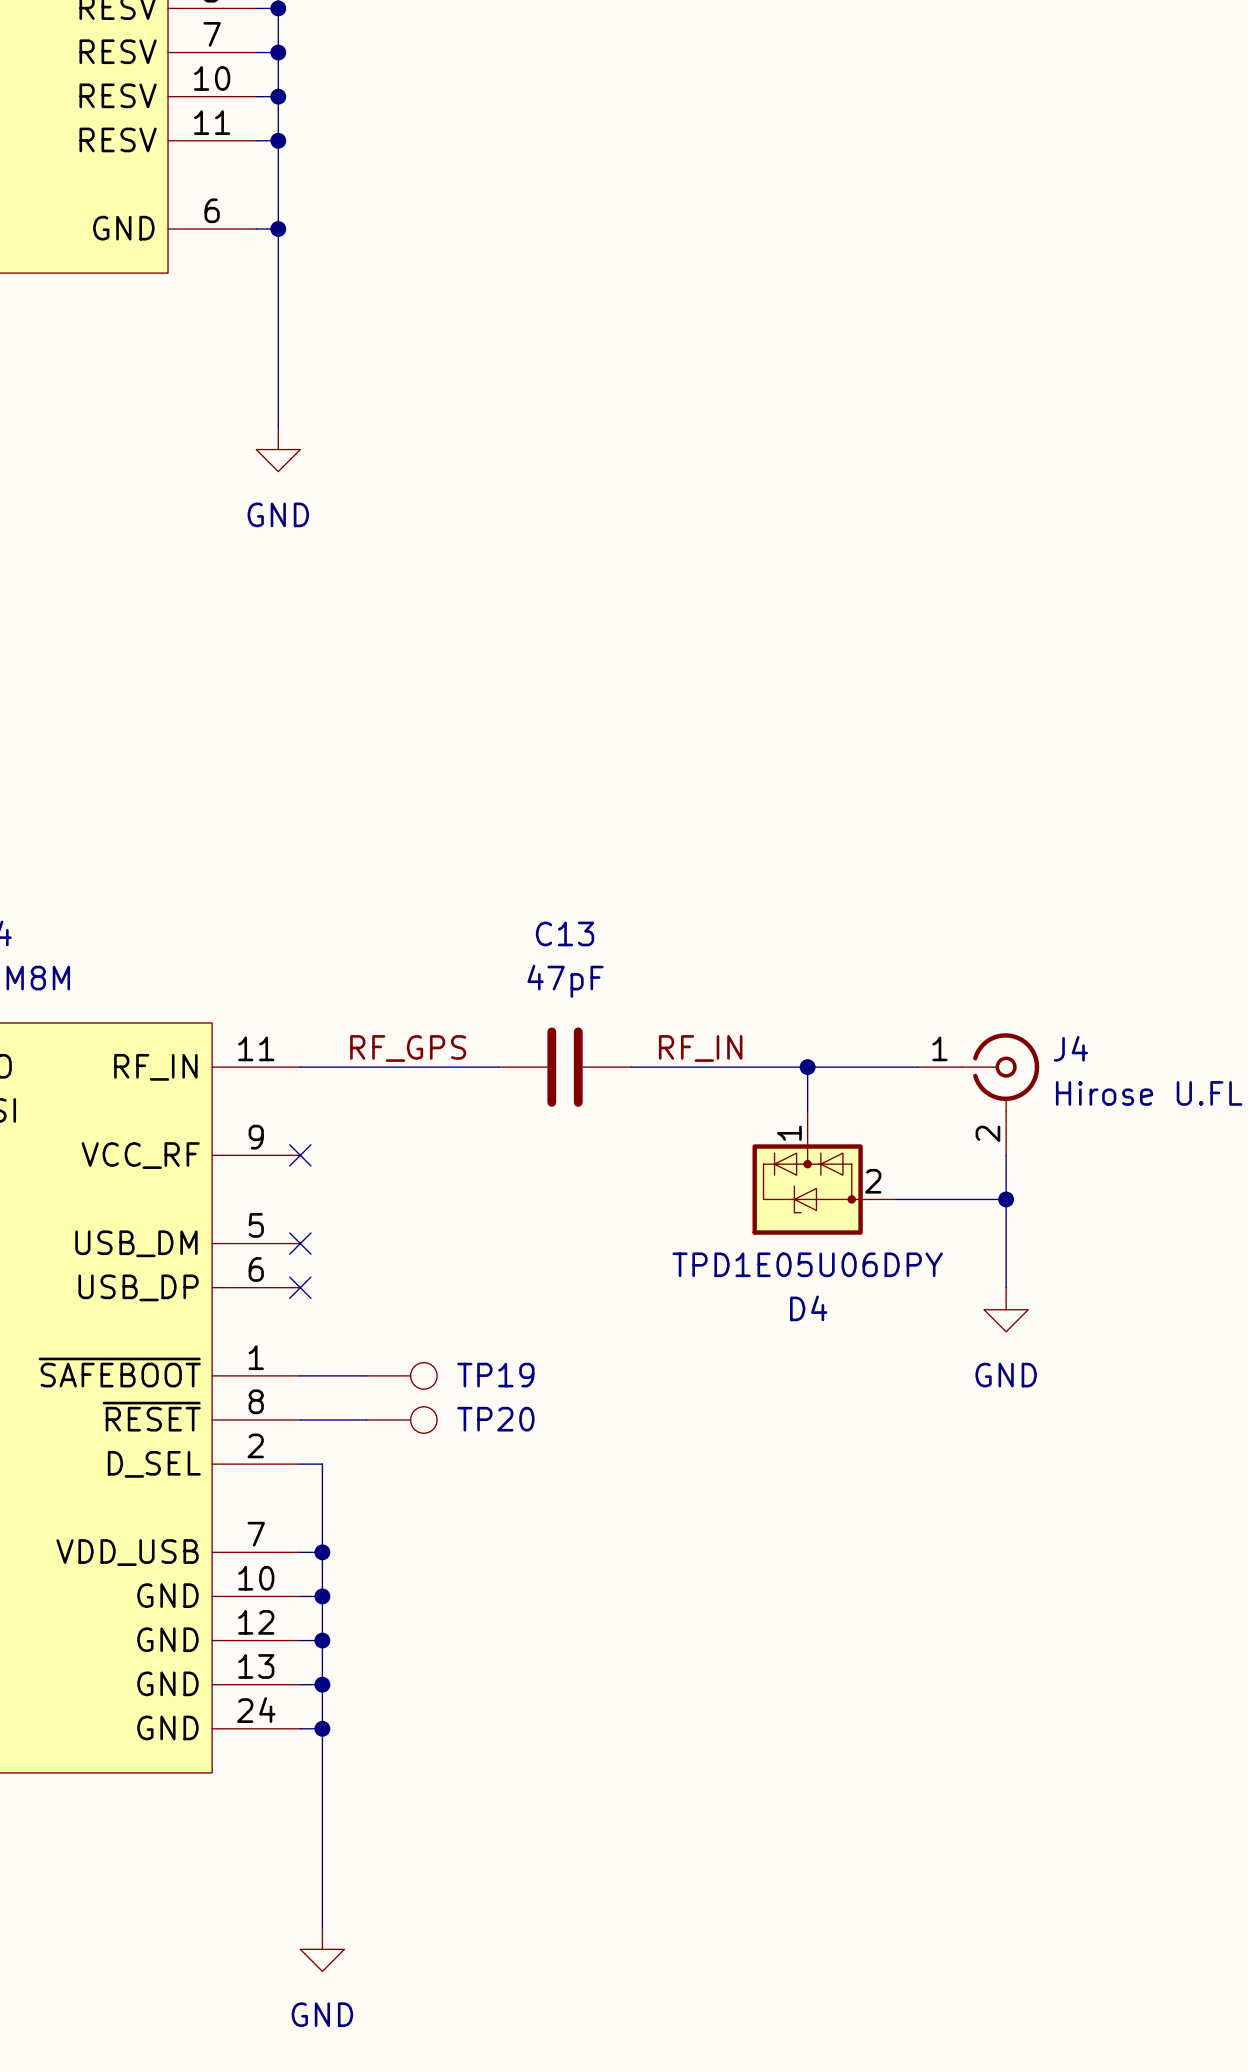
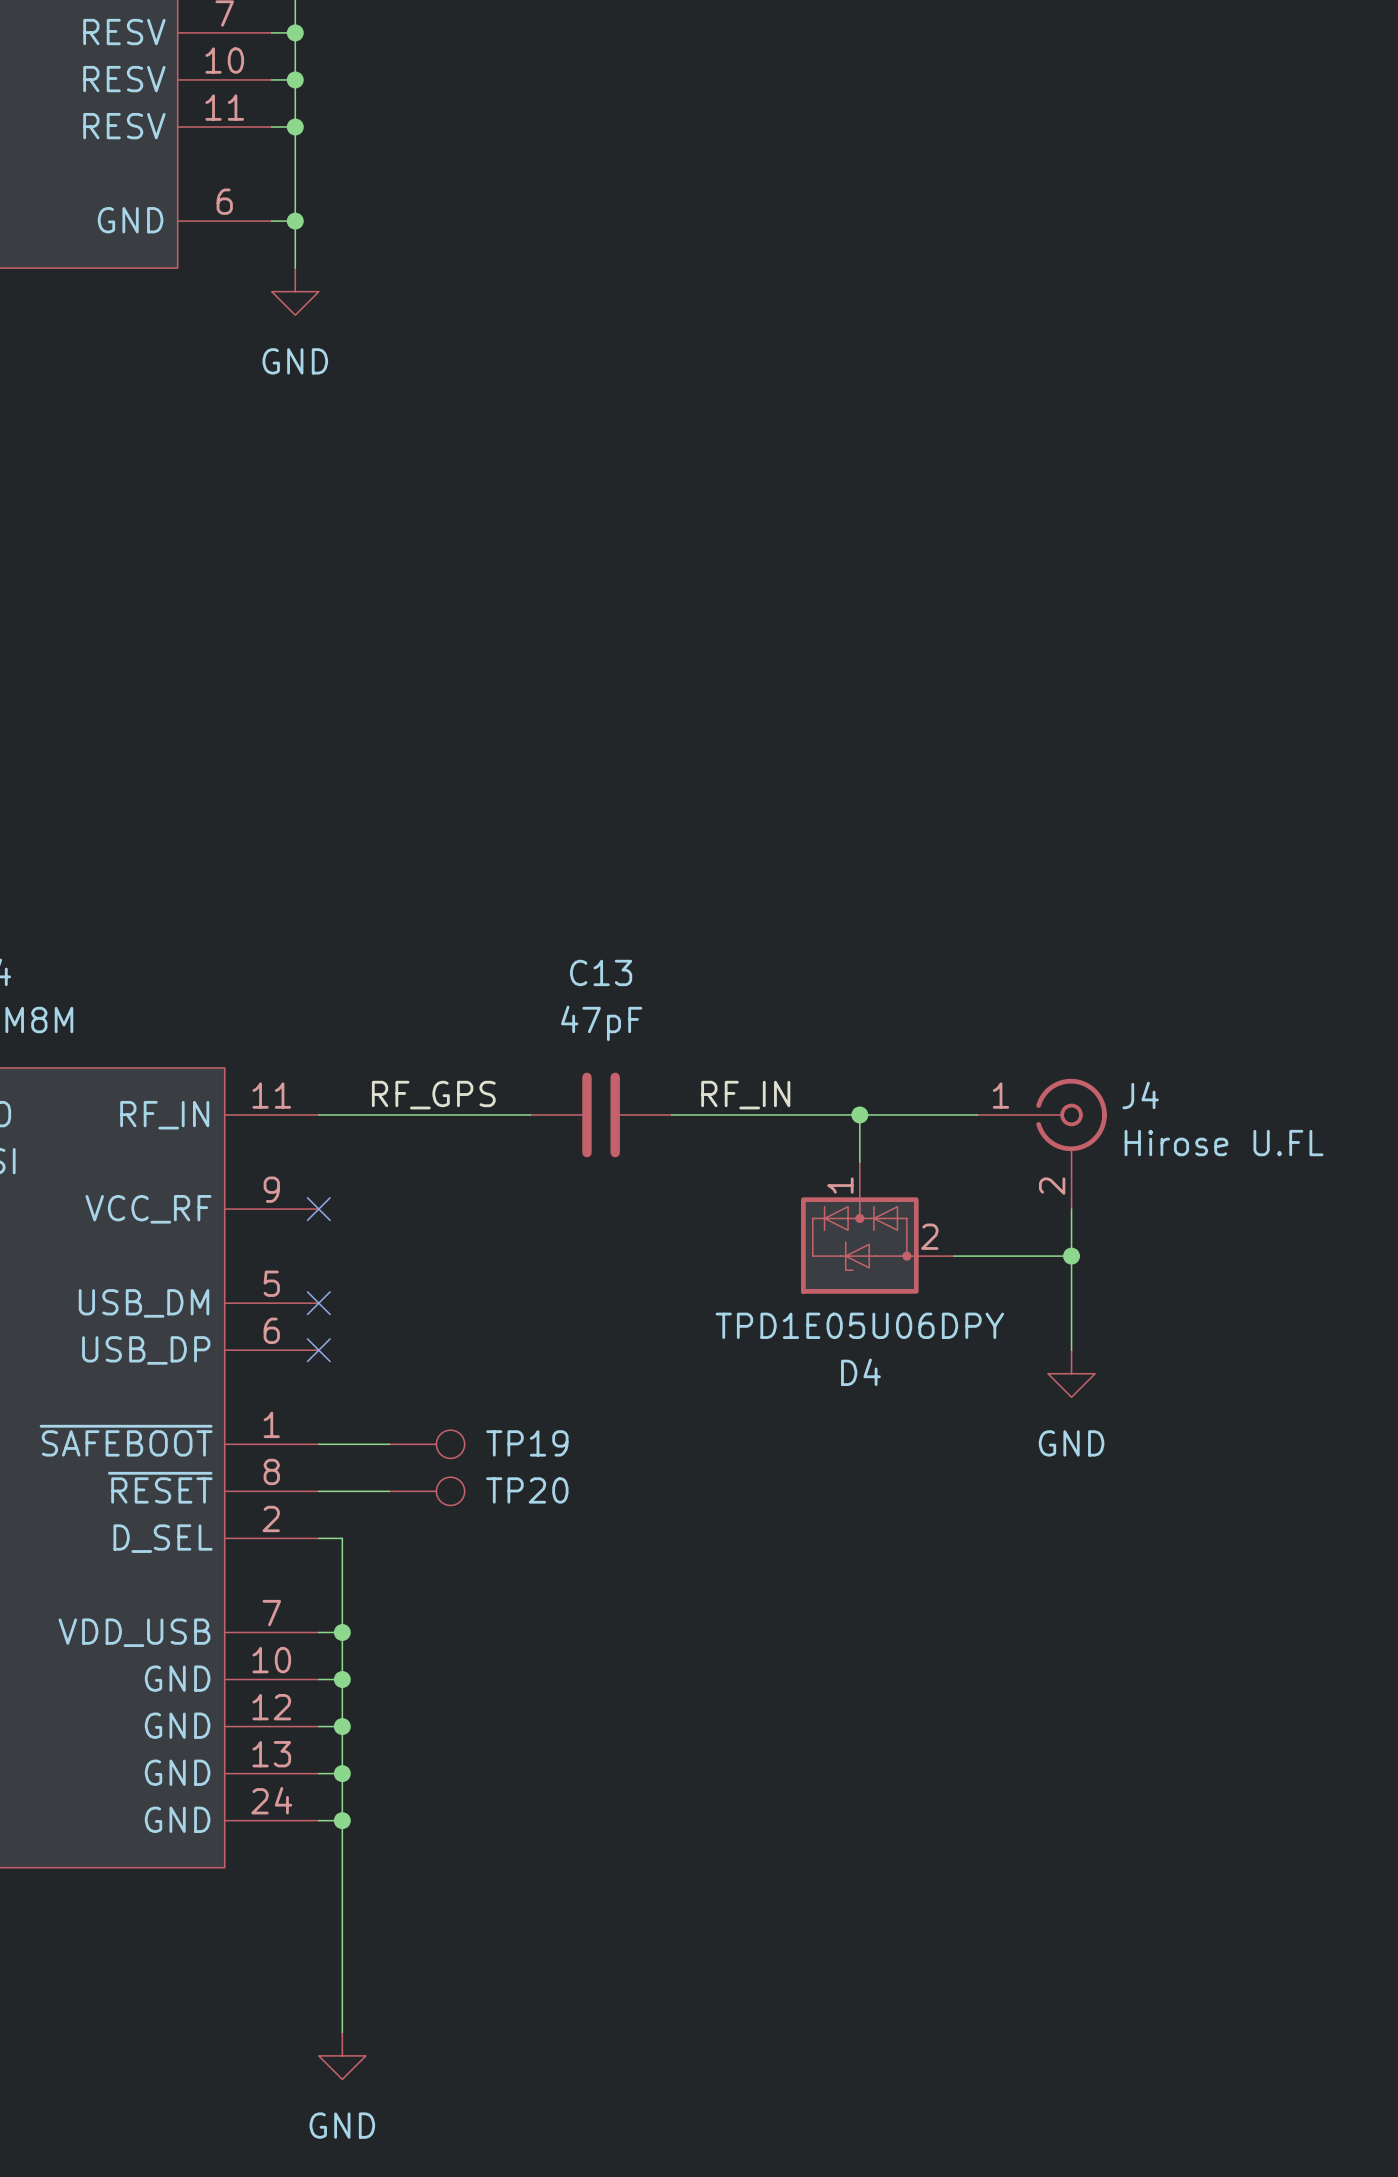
wire: (278, 273) (278, 427) -> none
power symbol position: GND (278, 449) -> GND (295, 291)

